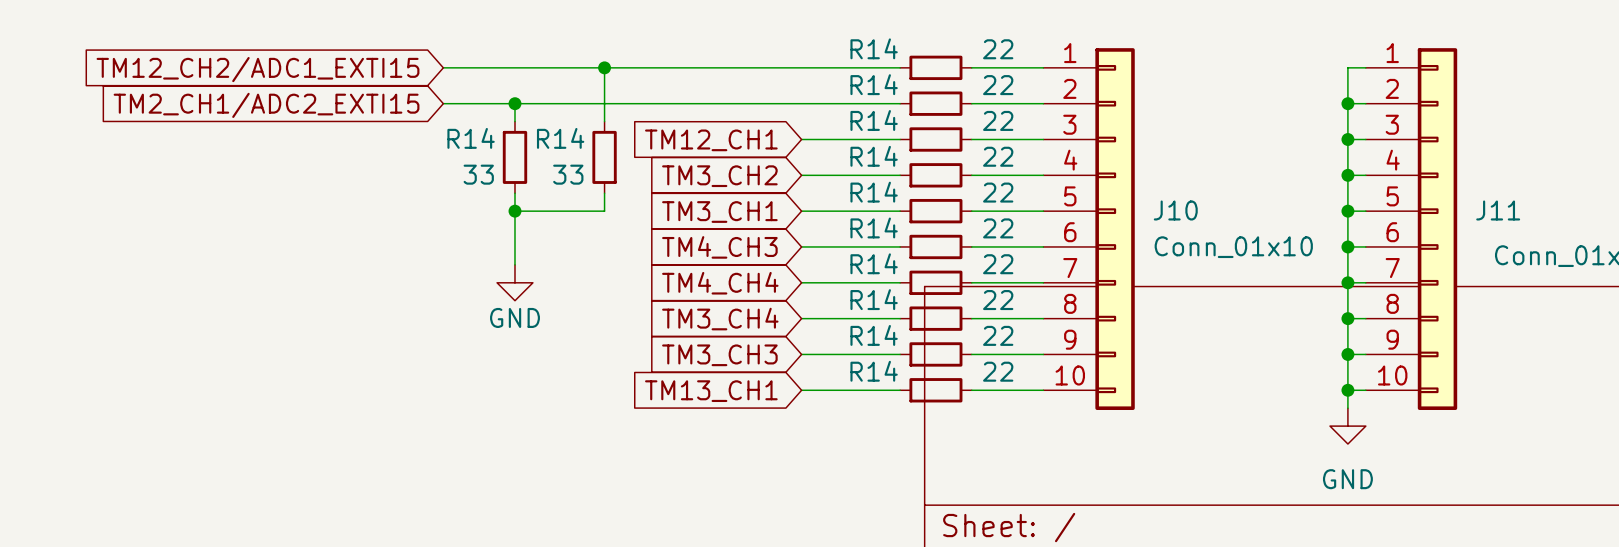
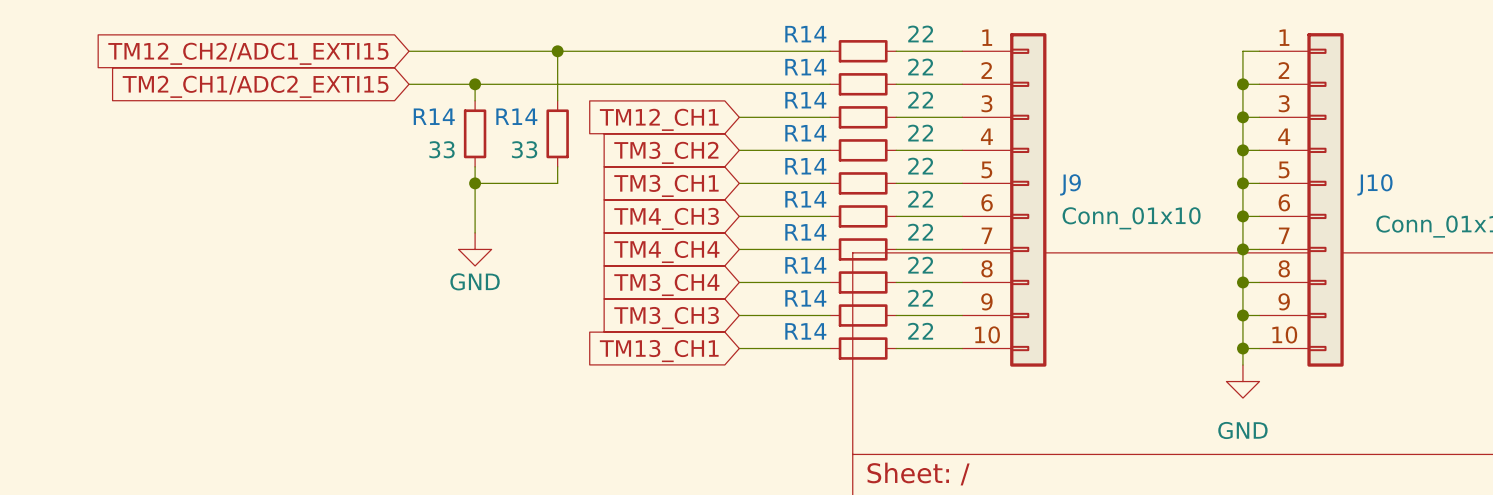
J10 name: J10 (1175, 210) -> J9 (1070, 184)
J11 name: J11 (1498, 210) -> J10 (1374, 184)

